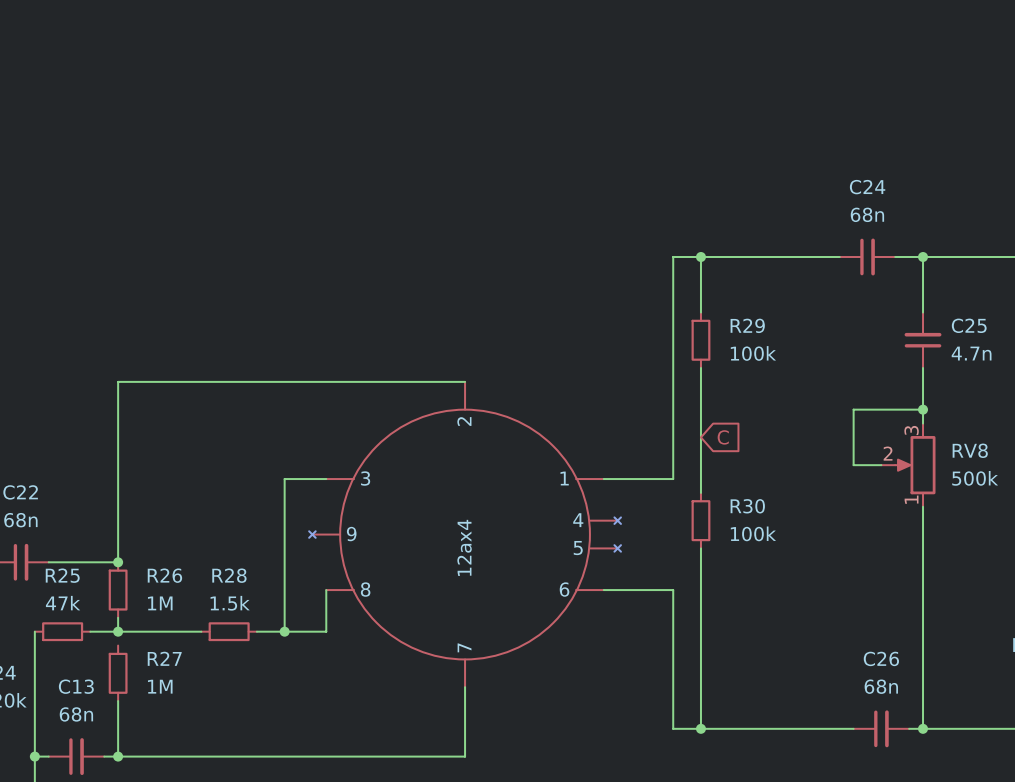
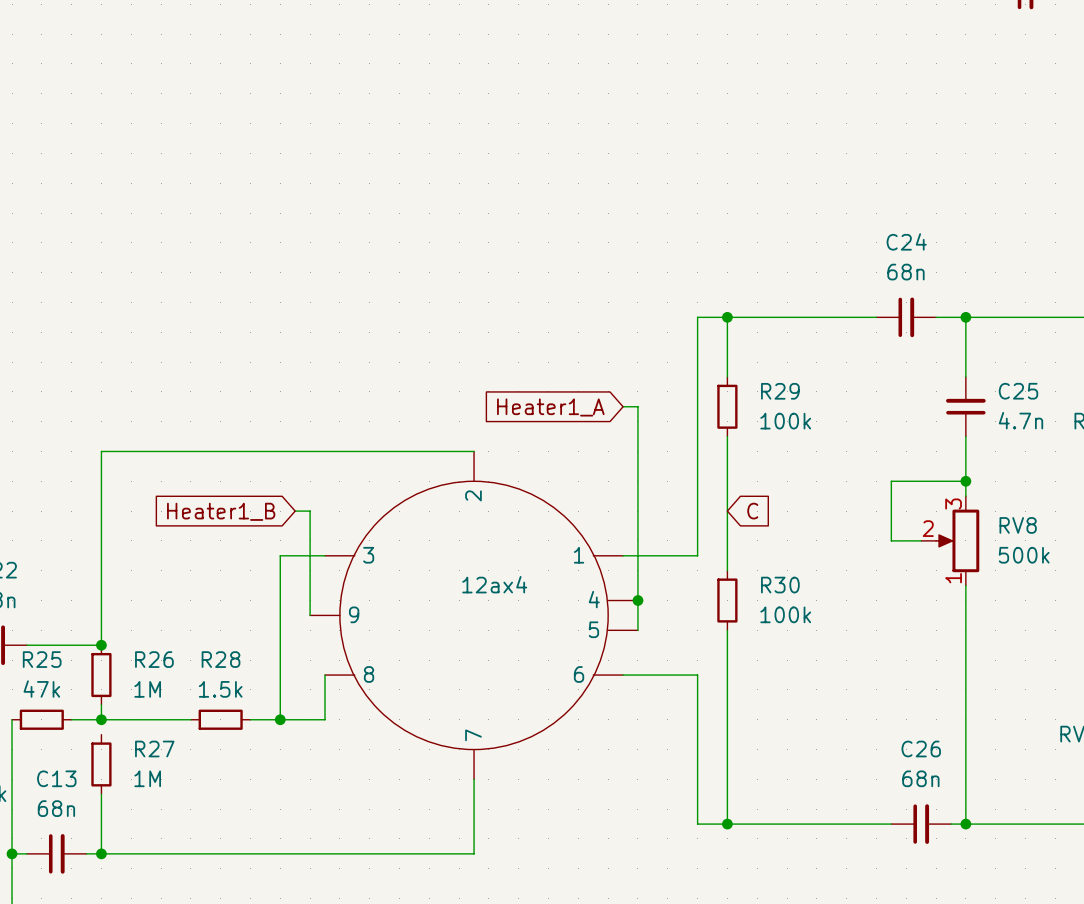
wire: none -> (623, 406) (637, 406) (637, 630)
global label: none -> Heater1_A (550, 407)
12ax4 symbol: [309, 381, 621, 688] -> [310, 451, 638, 780]
wire: none -> (295, 511) (310, 511) (310, 615)
global label: none -> Heater1_B (221, 511)
junction: none -> (637, 600)
12ax4 name position: 12ax4 (464, 547) -> 12ax4 (494, 584)

